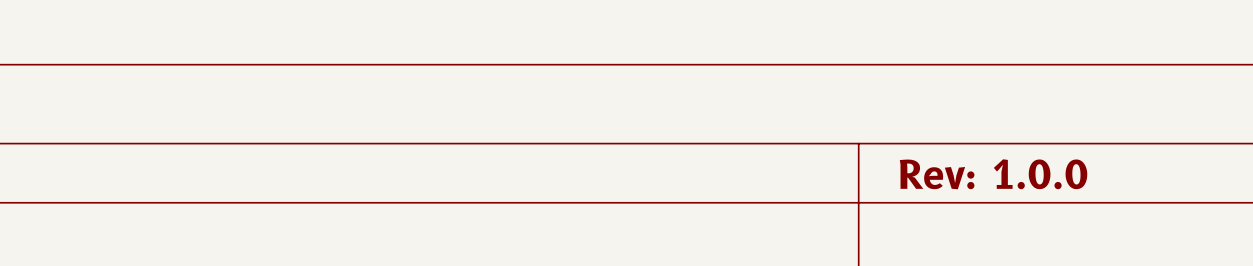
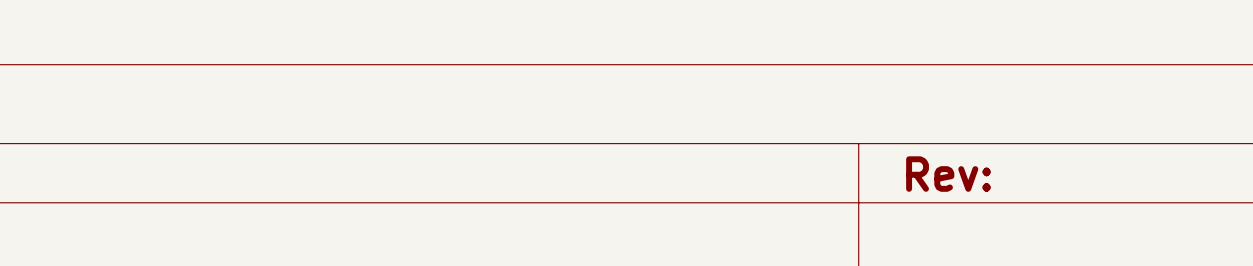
title block: Rev: 1.0.0 (993, 174) -> Rev: (948, 174)

